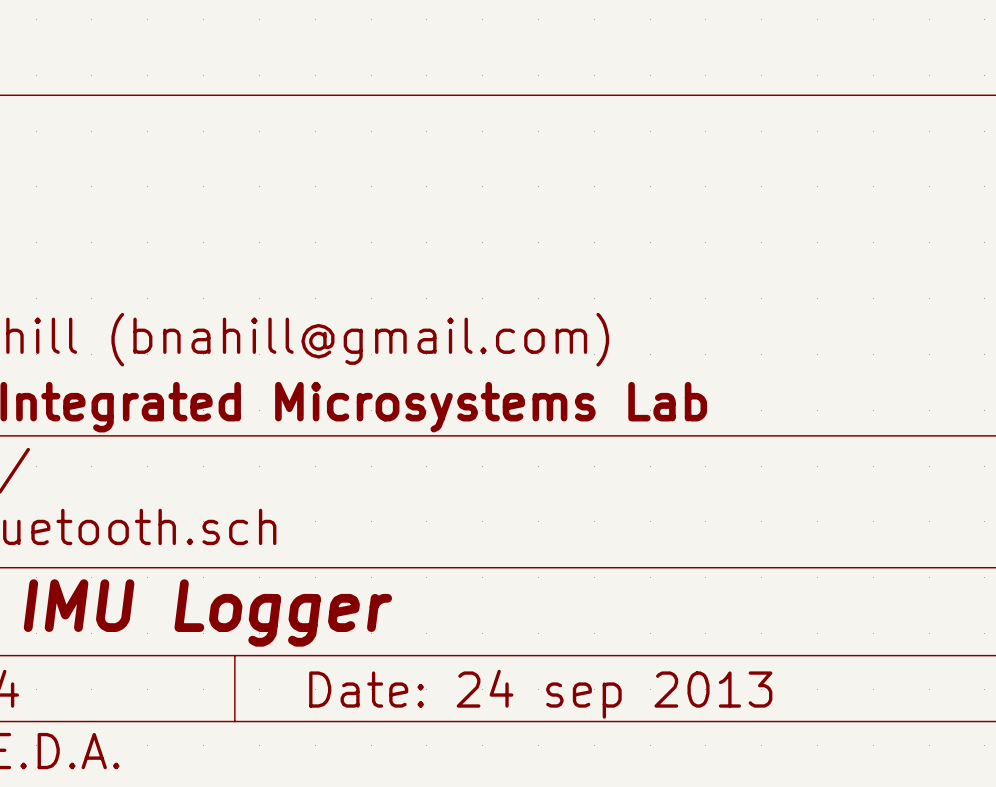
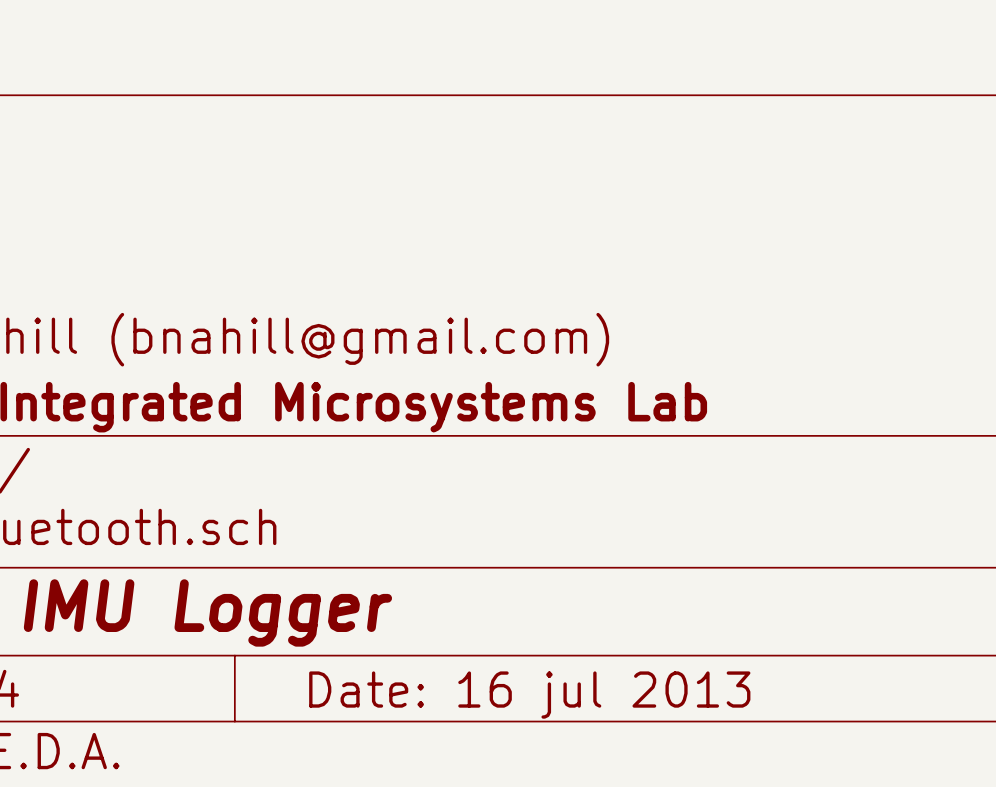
title block: Date: 24 sep 2013 (540, 694) -> Date: 16 jul 2013 (529, 695)

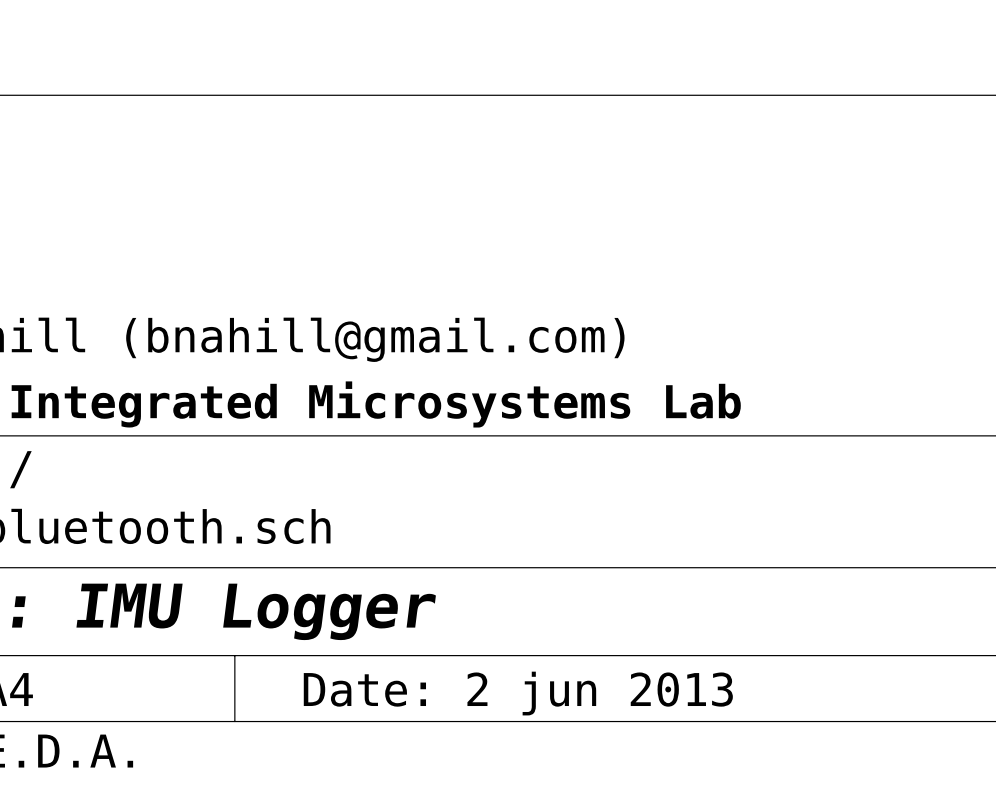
title block: Date: 16 jul 2013 (529, 695) -> Date: 2 jun 2013 (518, 693)

